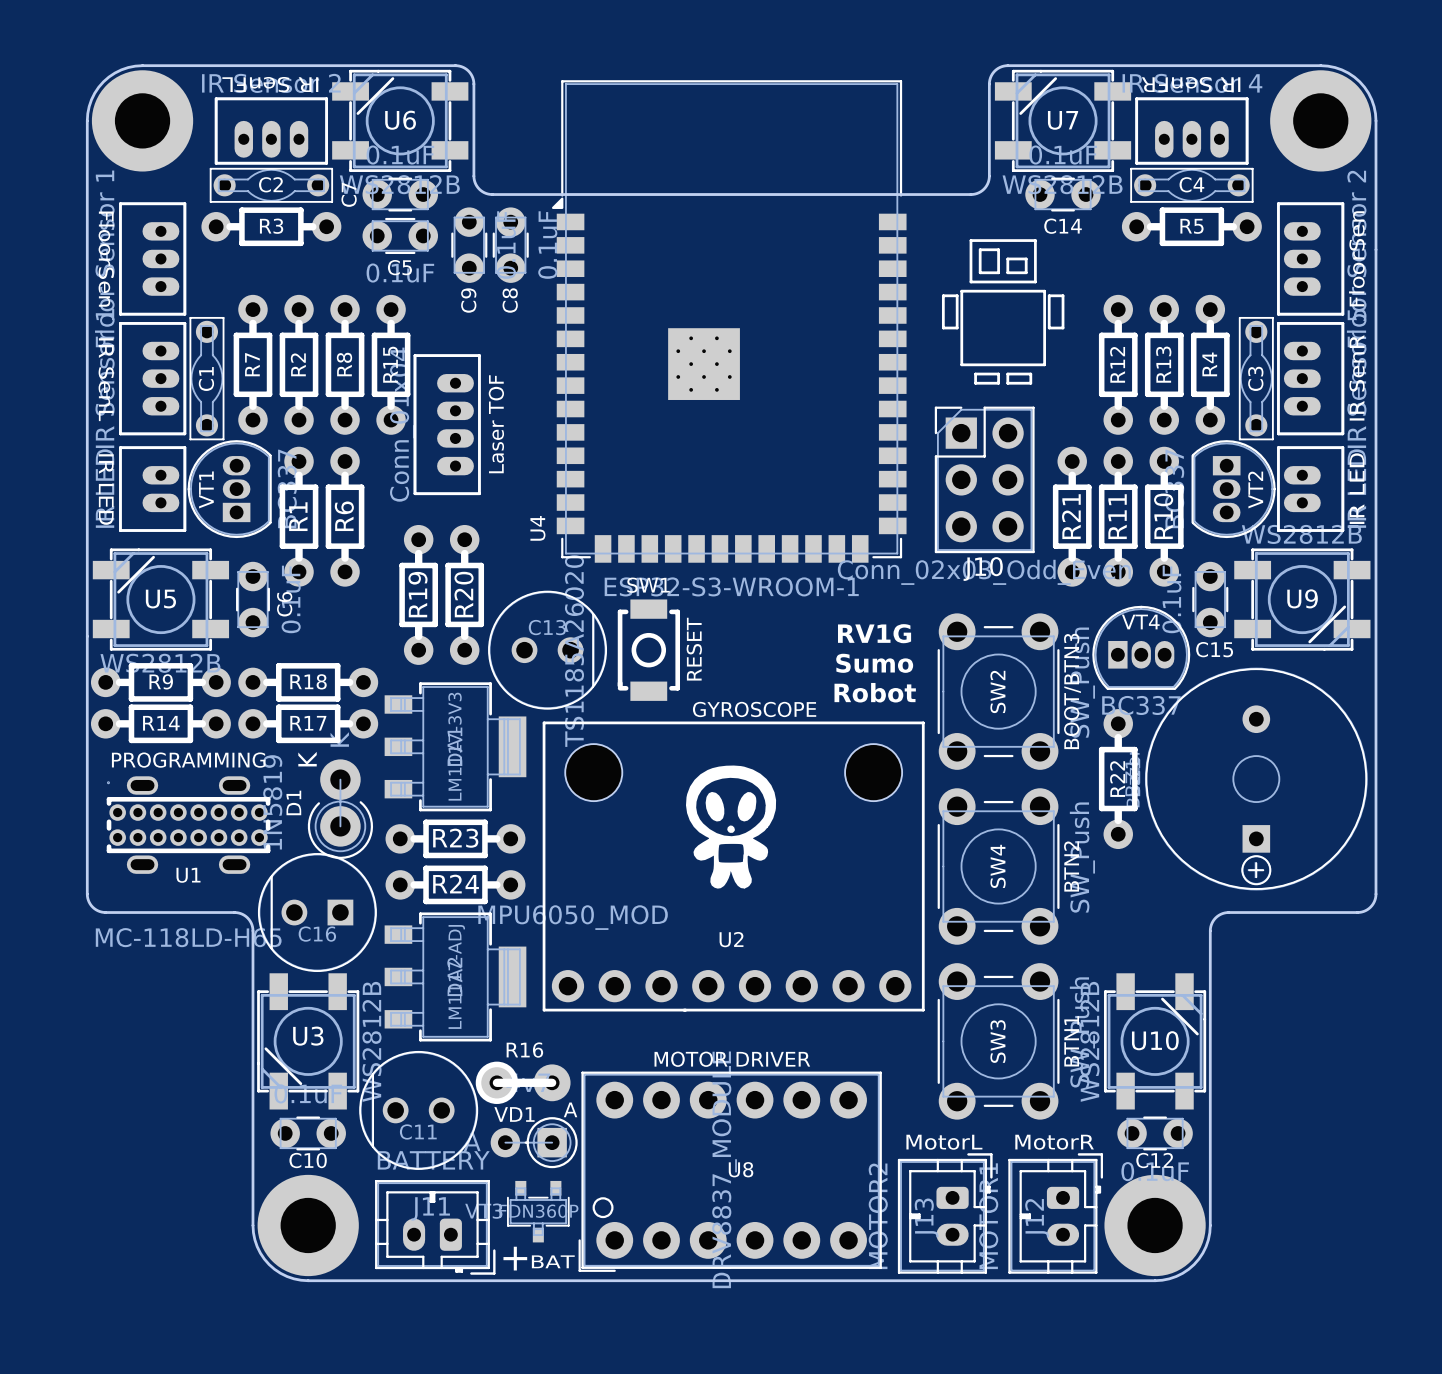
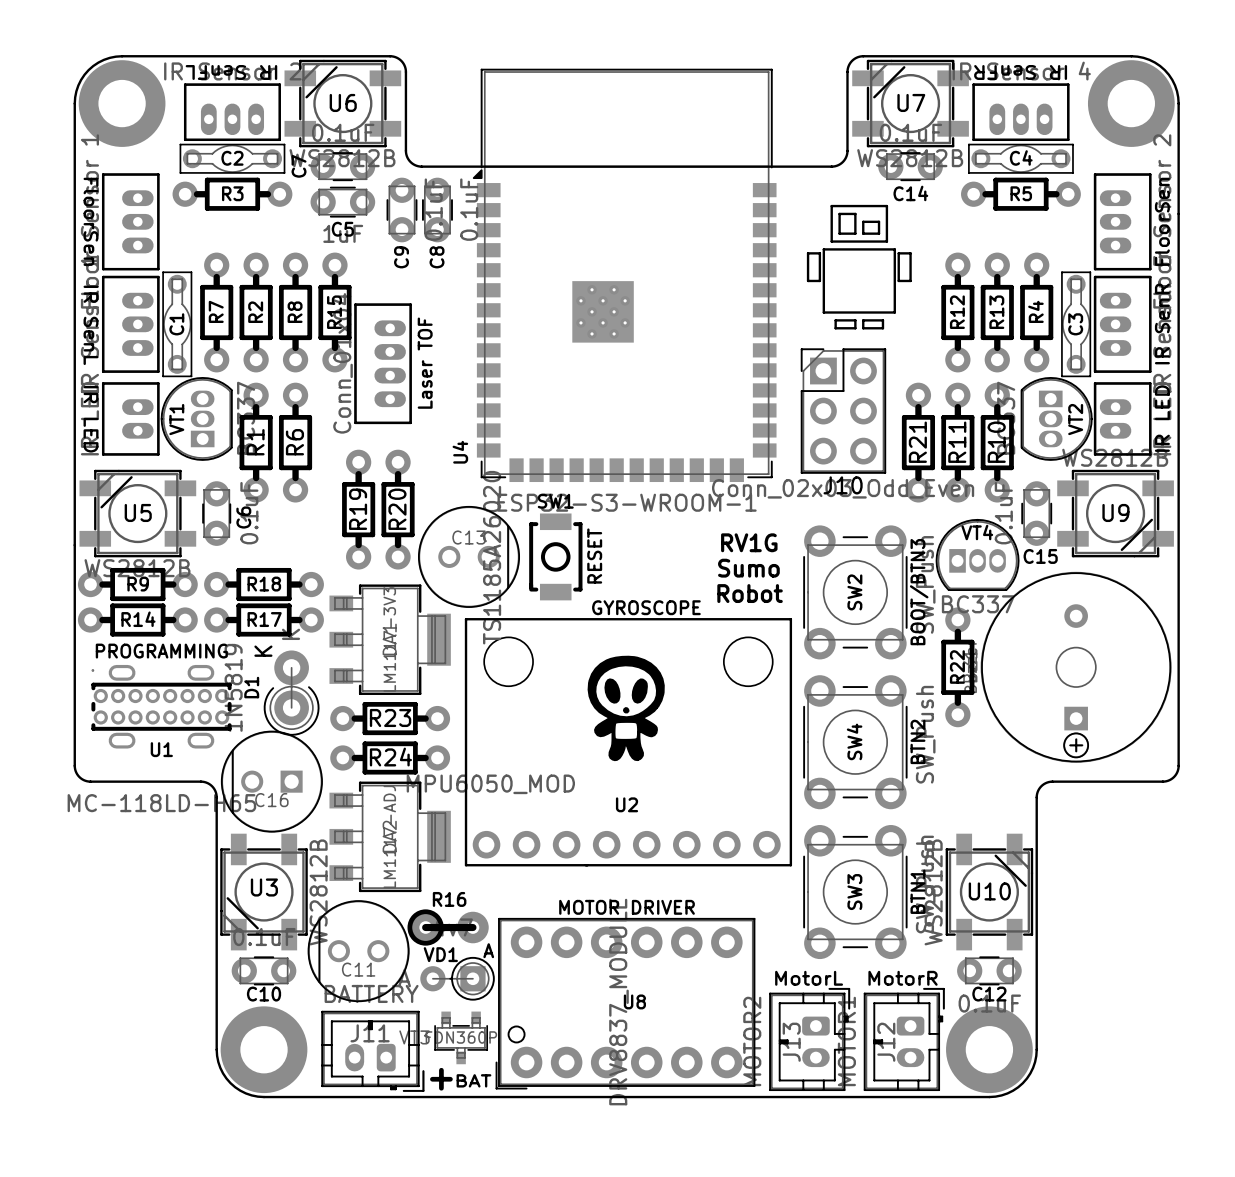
C5 value: 0.1uF (400, 273) -> 1uF (343, 233)

